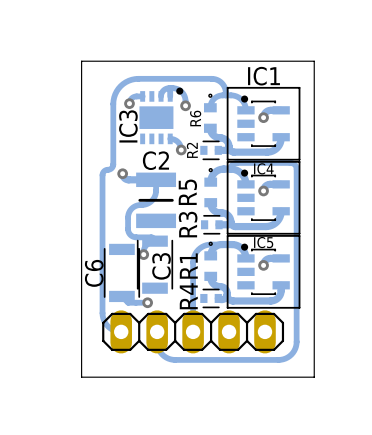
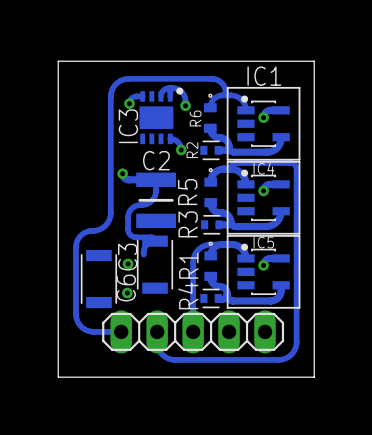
board edge: (81, 61) (81, 377) -> (81, 61) (58, 61) (58, 377) (81, 377)
track: (138, 78) (125, 82) (115, 94) (113, 103) (113, 165) (102, 174) (102, 315) (108, 326) (121, 331) -> (138, 78) (121, 80) (116, 84) (111, 92) (109, 219) (101, 228) (82, 234) (76, 245) (75, 313) (78, 322) (89, 331) (121, 331)
via position: (143, 254) -> (128, 263)
C3 name position: C3 (161, 266) -> C3 (127, 257)
C6 position: (121, 272) -> (98, 279)
C6 name position: C6 (94, 273) -> C6 (126, 288)
via: none -> (127, 293)
track: (121, 296) (128, 302) (147, 302) -> none
via: (147, 302) -> none

